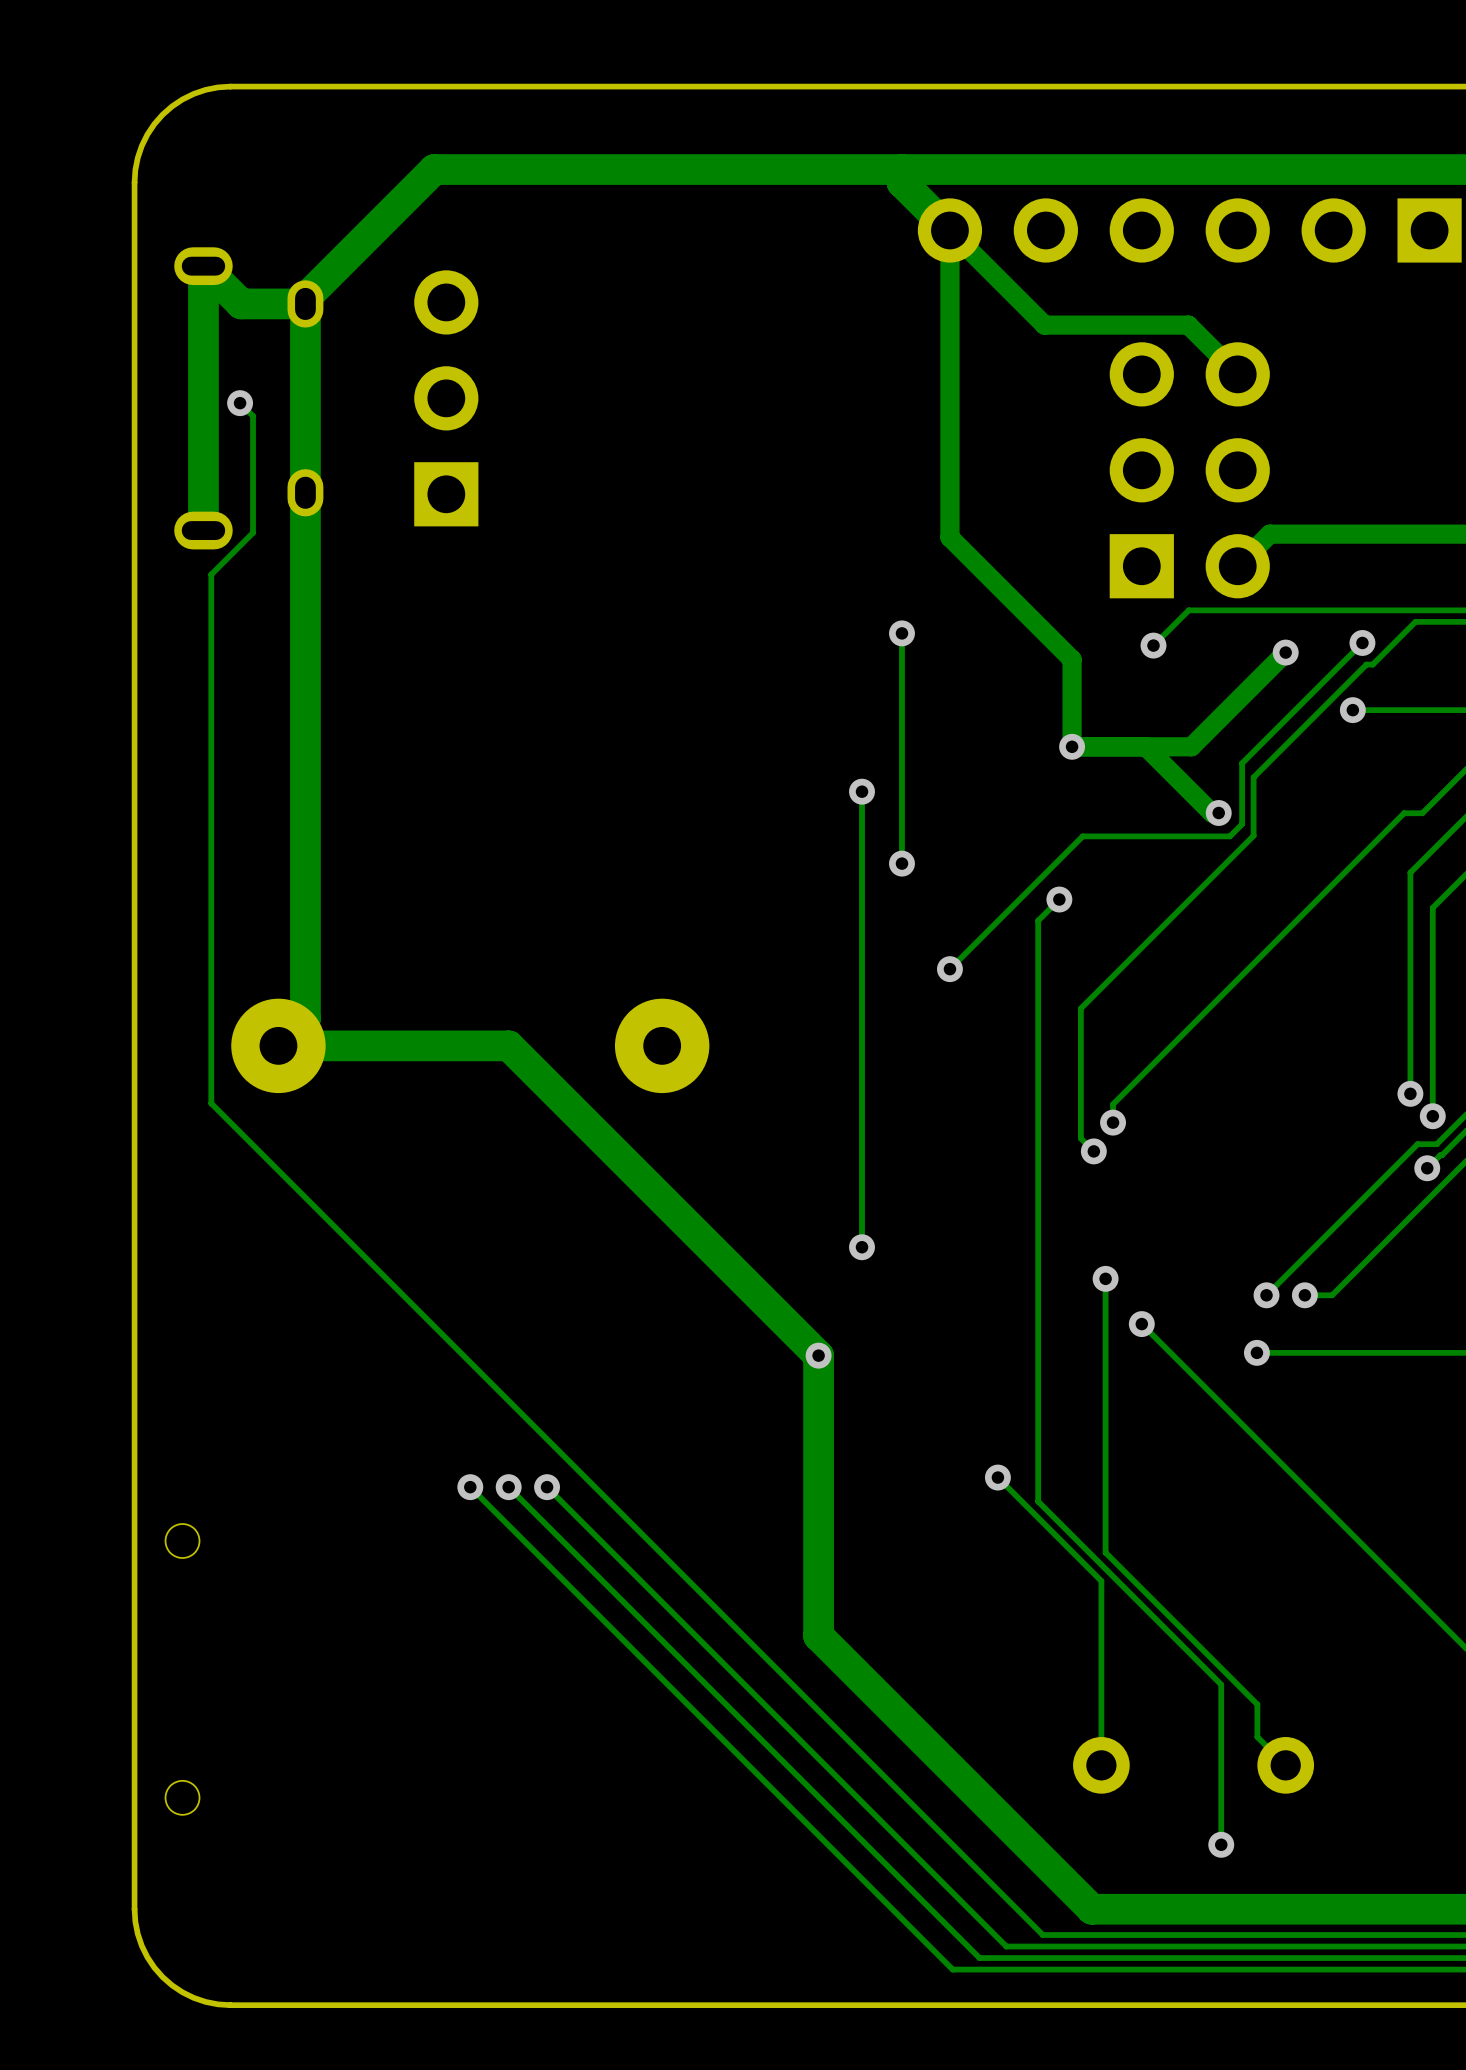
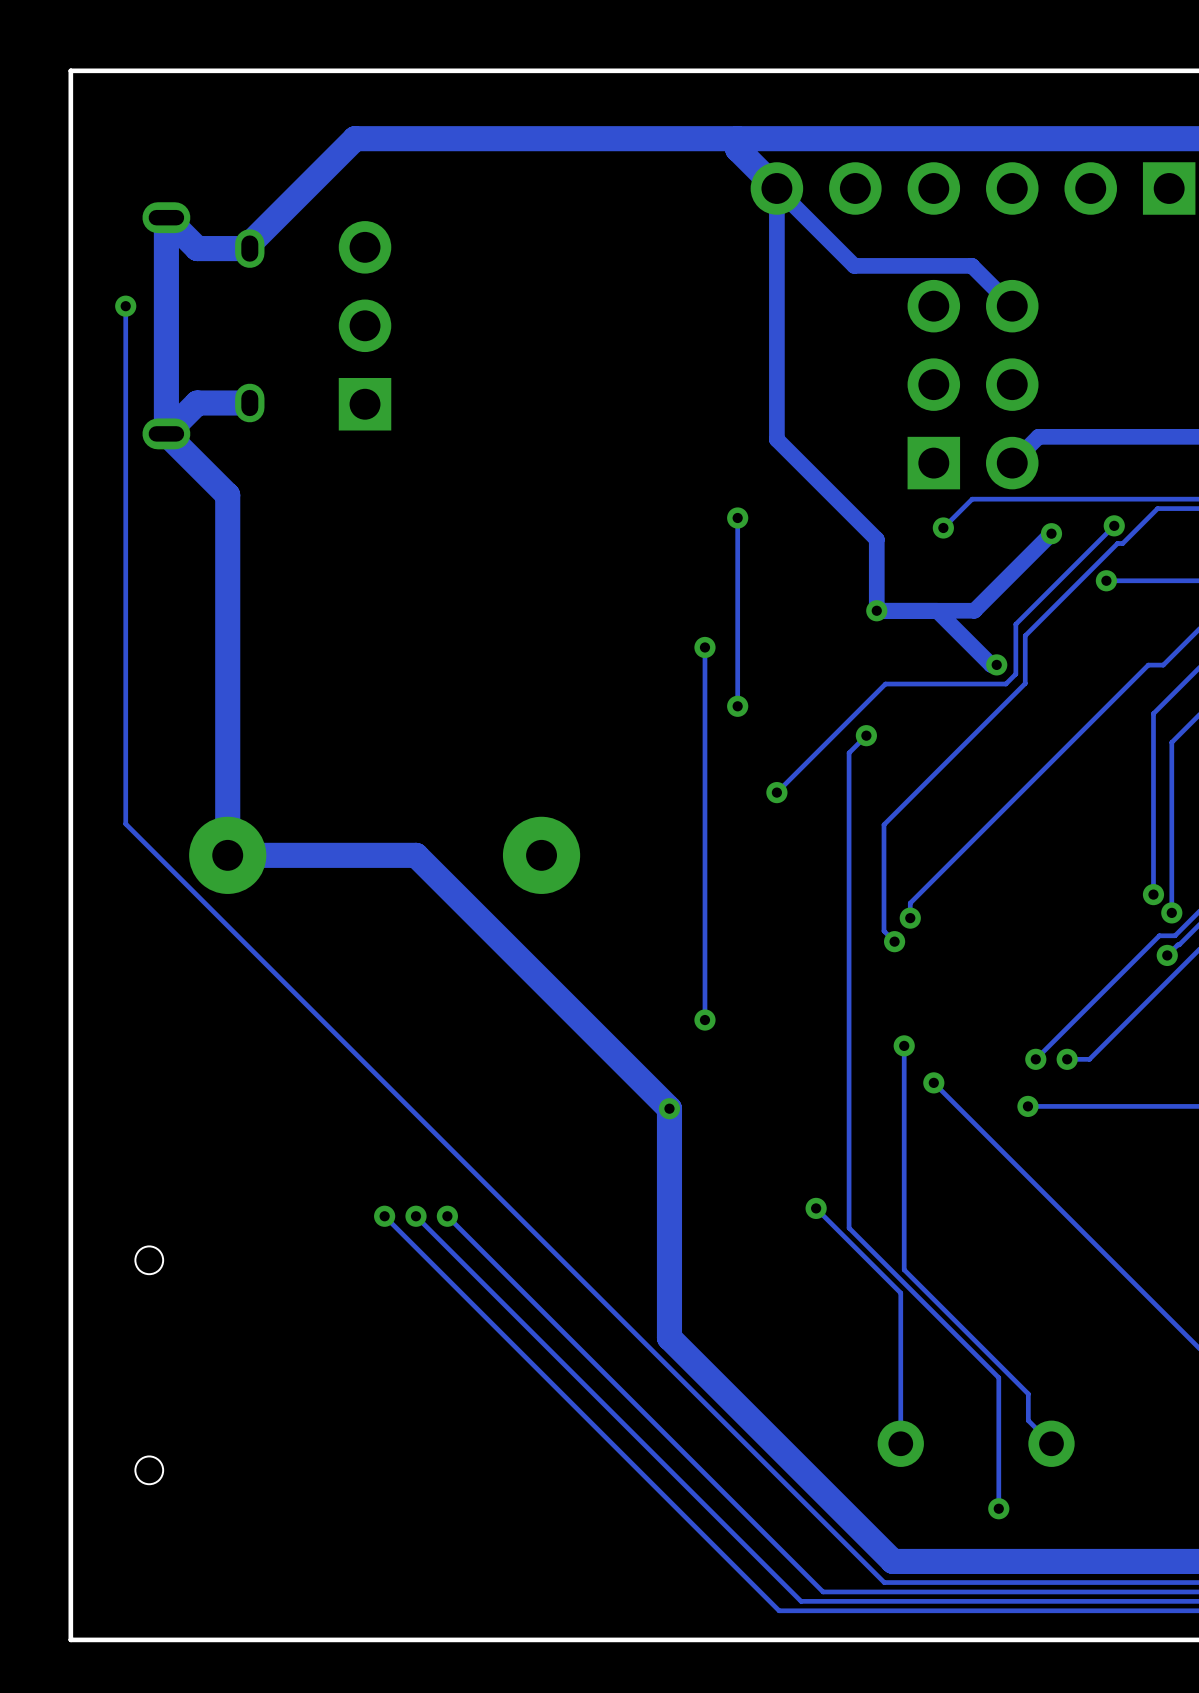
board edge: (230, 86) (217, 87) (193, 93) (182, 99) (162, 114) (147, 134) (141, 145) (135, 169) (134, 182) (134, 1909) (137, 1934) (141, 1945) (154, 1967) (162, 1977) (182, 1992) (193, 1997) (205, 2001) (230, 2005) -> (188, 70) (70, 70) (70, 1639) (188, 1639)
track: (305, 303) (305, 1018) (278, 1045) -> (249, 403) (197, 403) (166, 433) (227, 495) (227, 855)
track: (240, 403) (253, 416) (253, 532) (211, 574) (211, 1103) (1042, 1935) (1081, 1935) -> (125, 306) (125, 823) (884, 1582)
via position: (240, 403) -> (125, 306)

